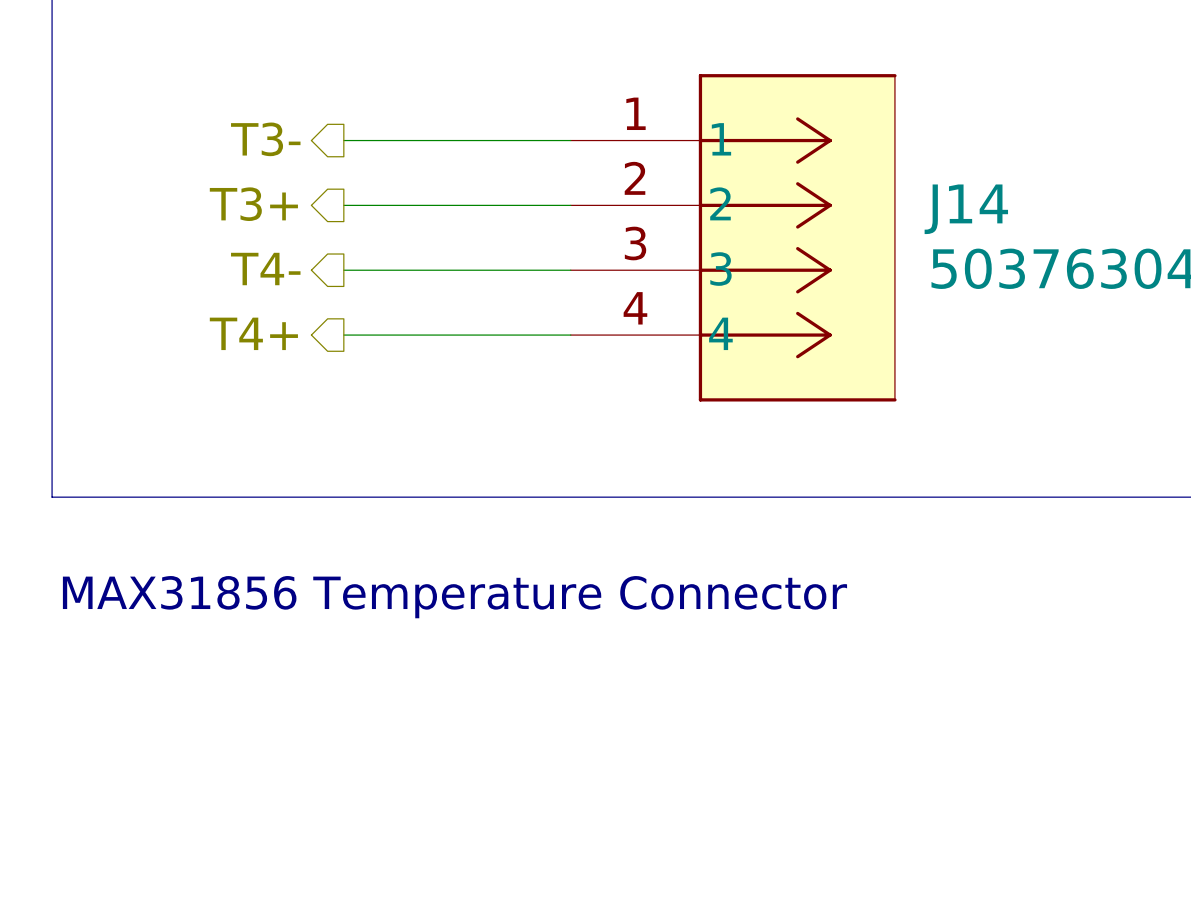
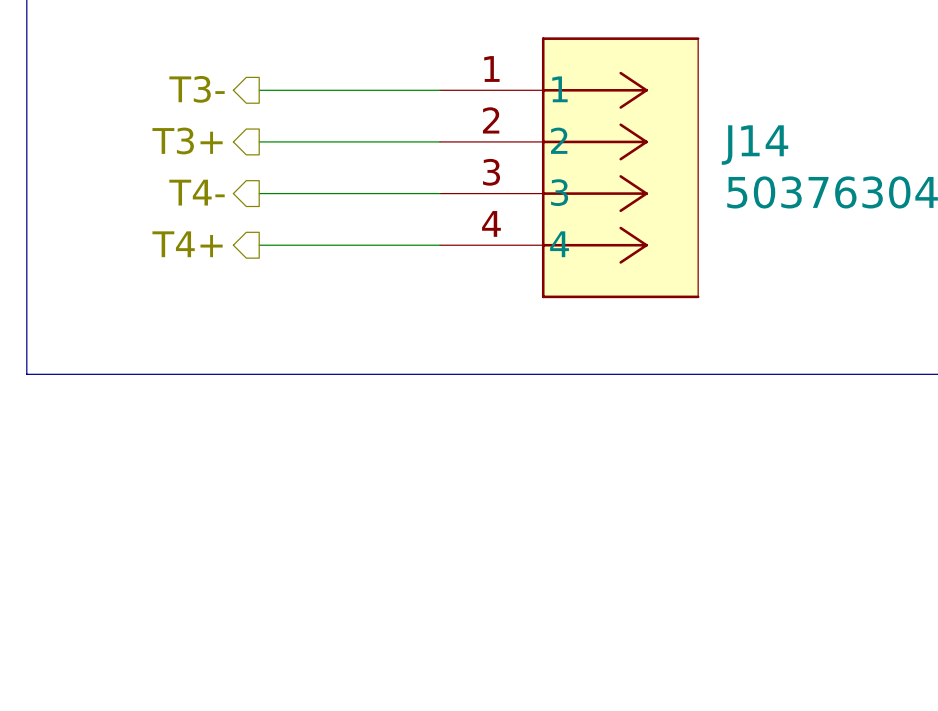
text: MAX31856 Temperature Connector (454, 597) -> none

